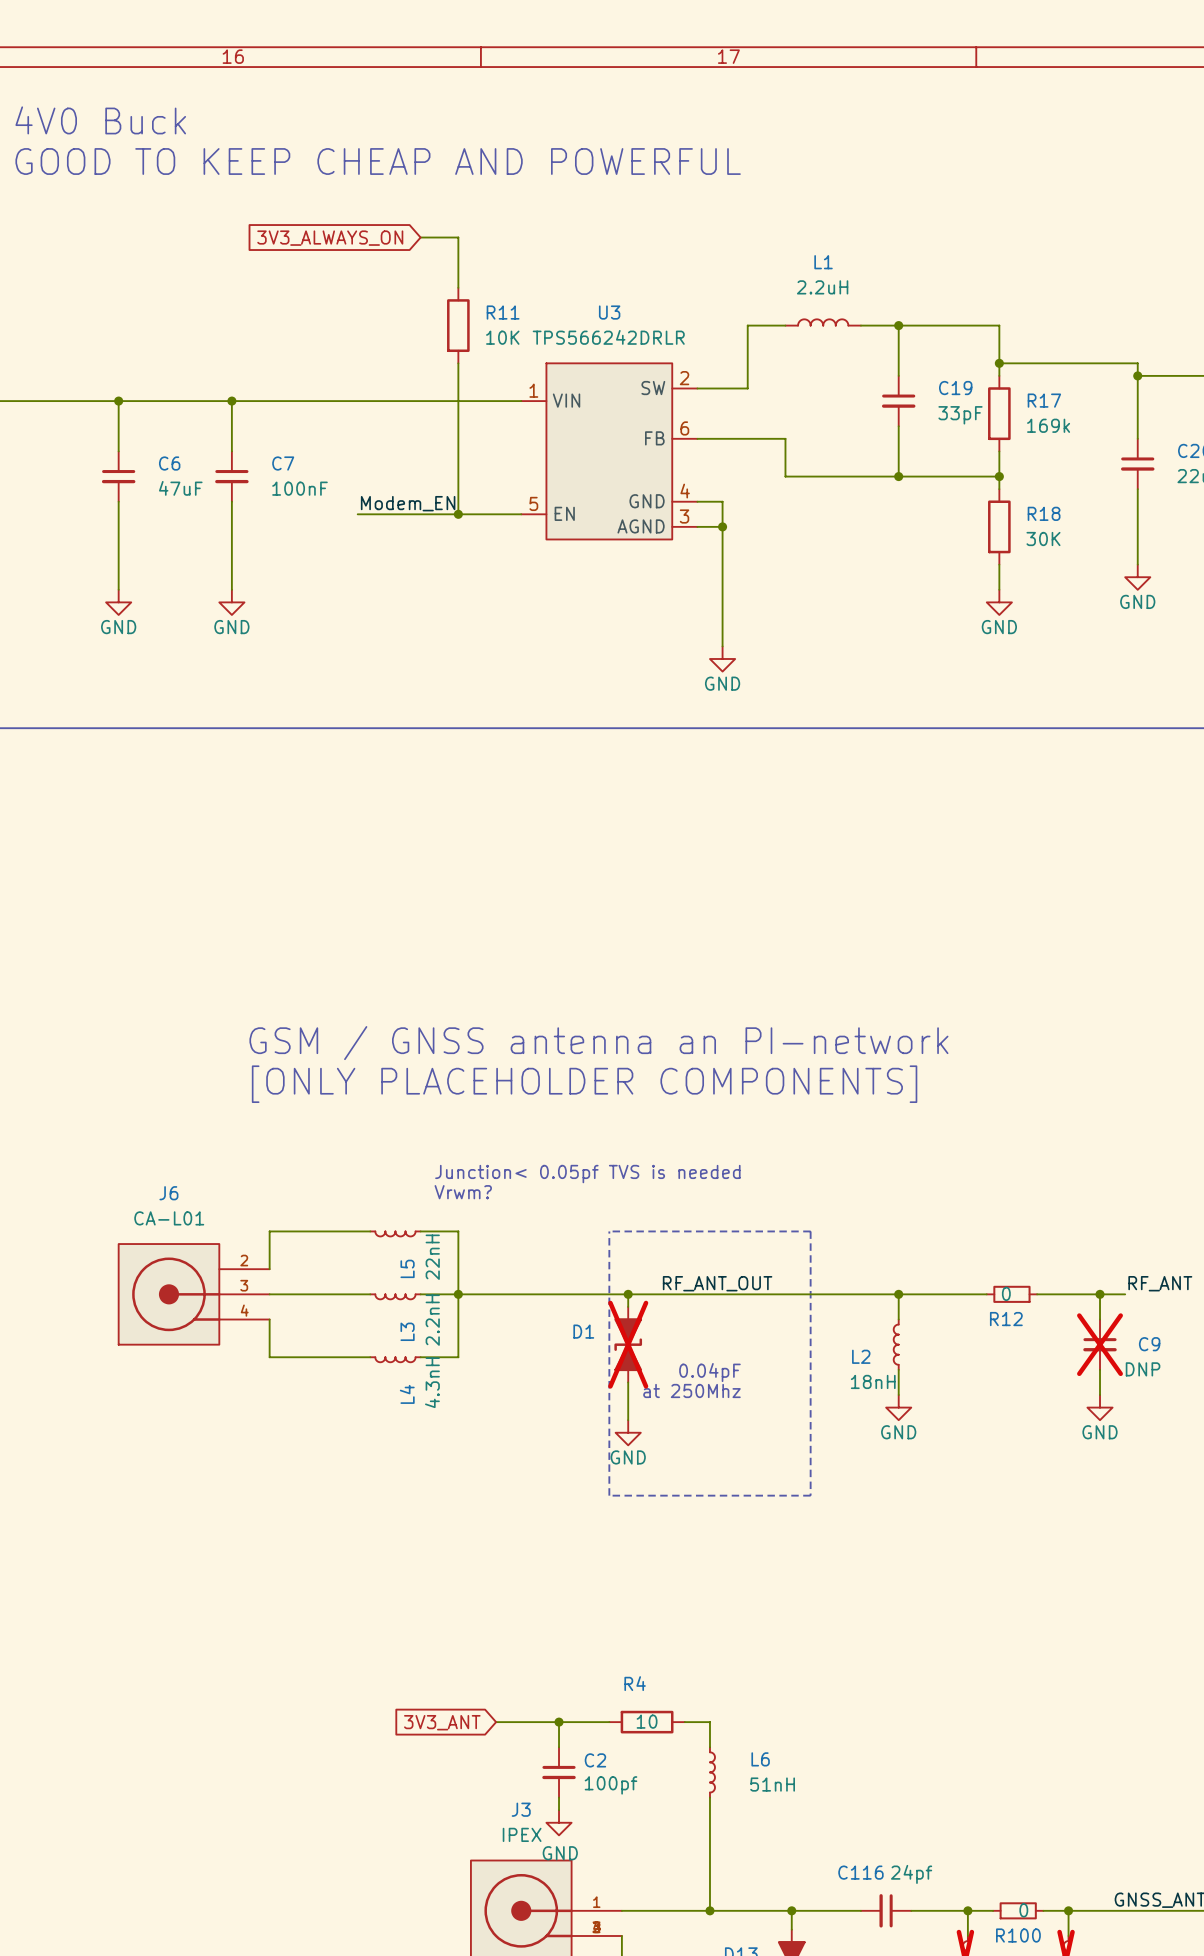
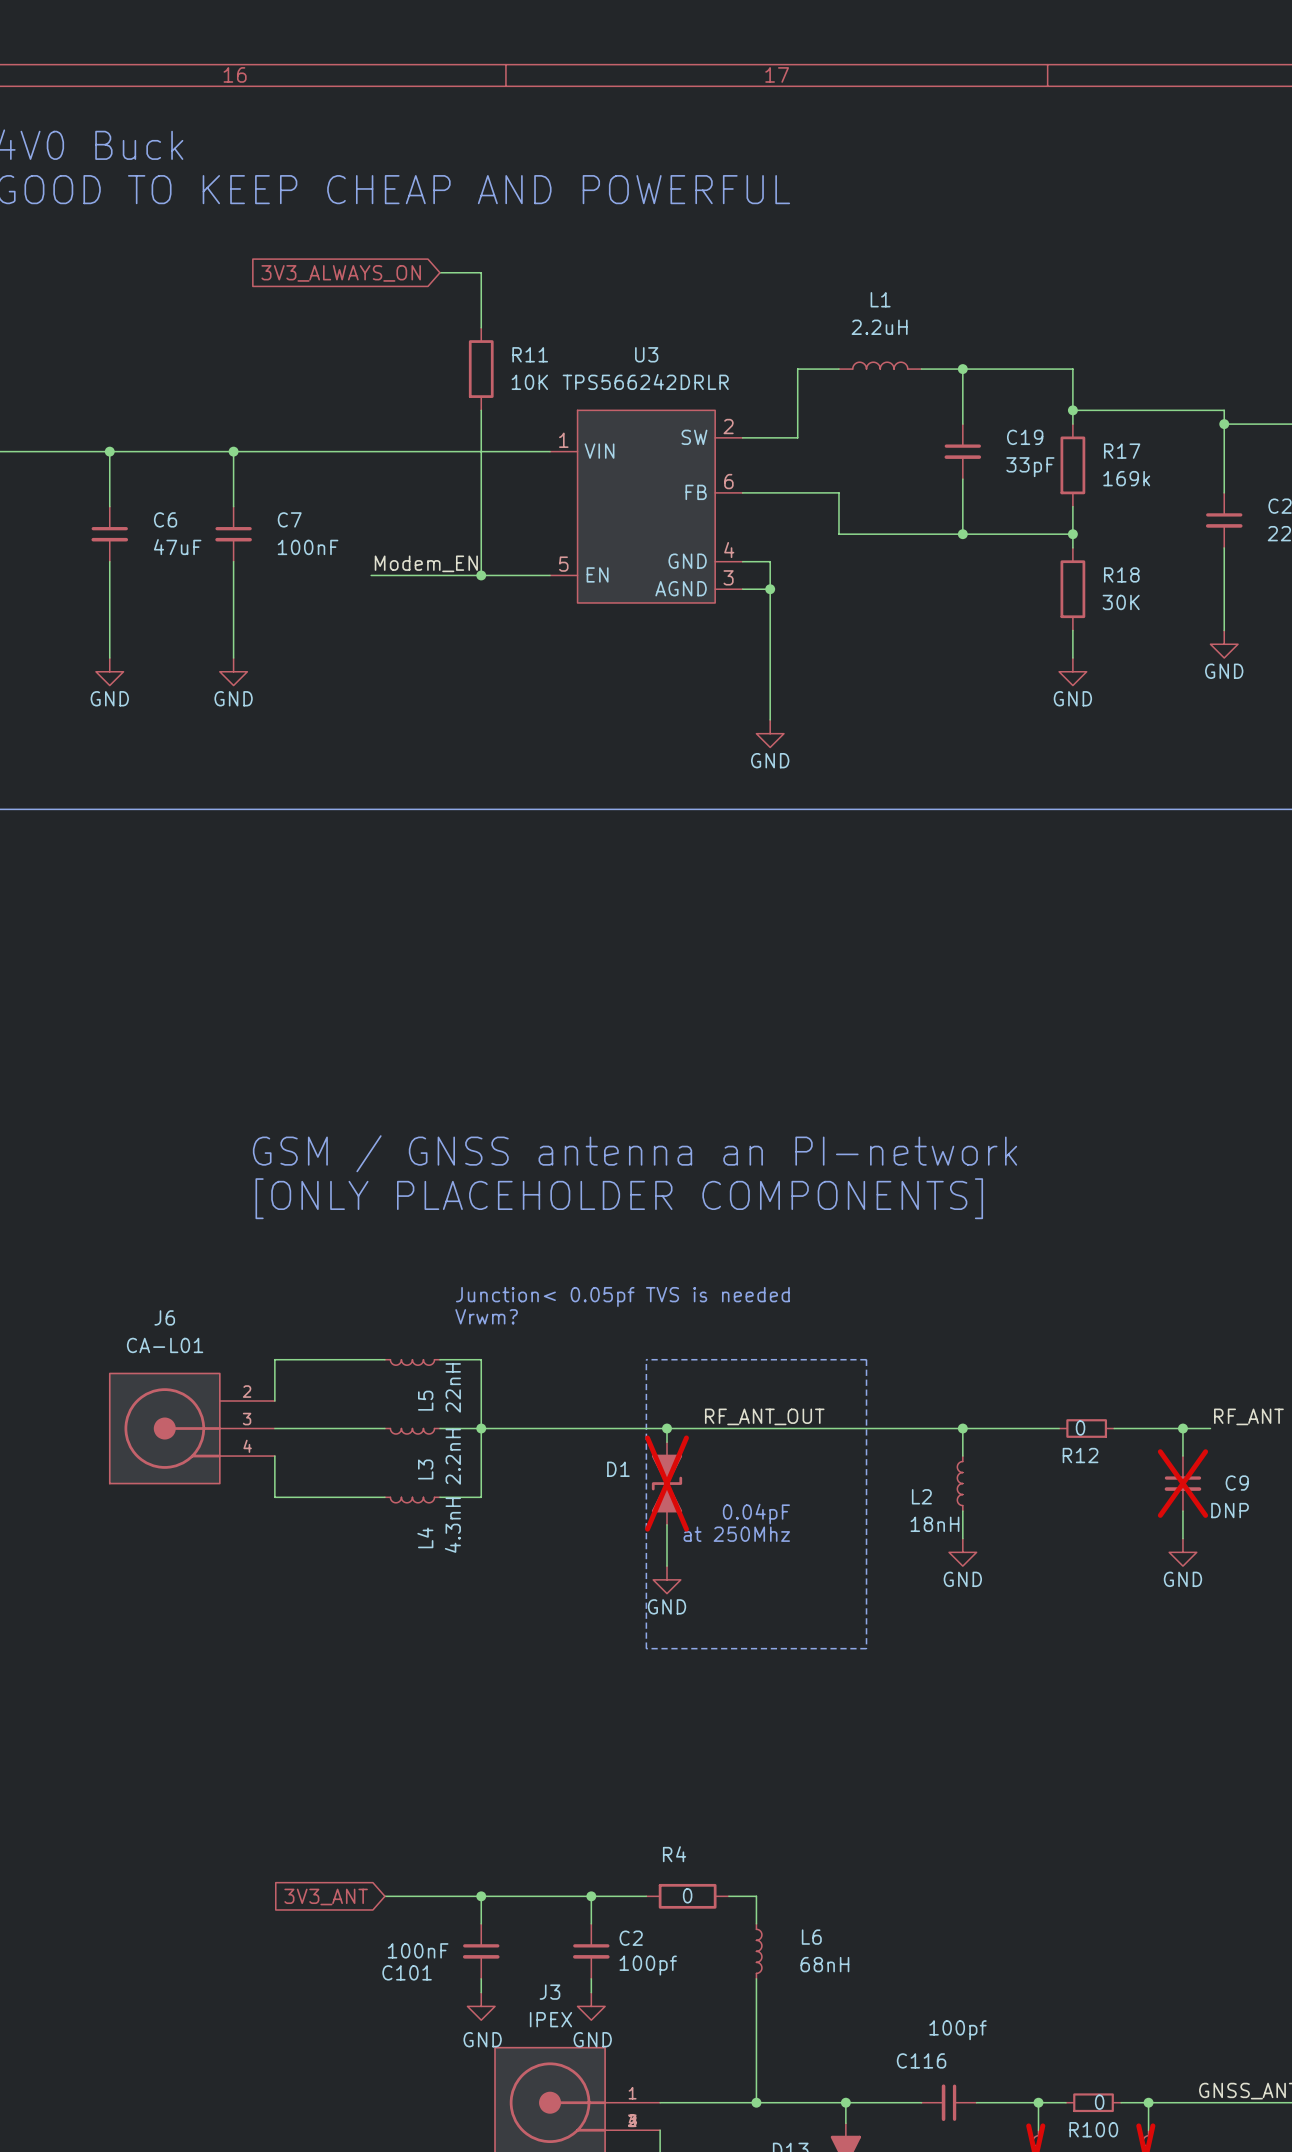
R4 value: 10 (647, 1721) -> 0 (687, 1895)
wire: none -> (384, 1896) (522, 1896)
global label position: 3V3_ANT (442, 1722) -> 3V3_ANT (326, 1896)
wire: none -> (481, 1896) (481, 1923)
junction: none -> (481, 1896)
C101: none -> 100nF (481, 1951)
L6 value: 51nH (772, 1784) -> 68nH (824, 1964)
wire: none -> (481, 1978) (481, 1992)
power symbol: none -> GND (481, 2006)
C116 value: 24pf (911, 1874) -> 100pf (957, 2030)

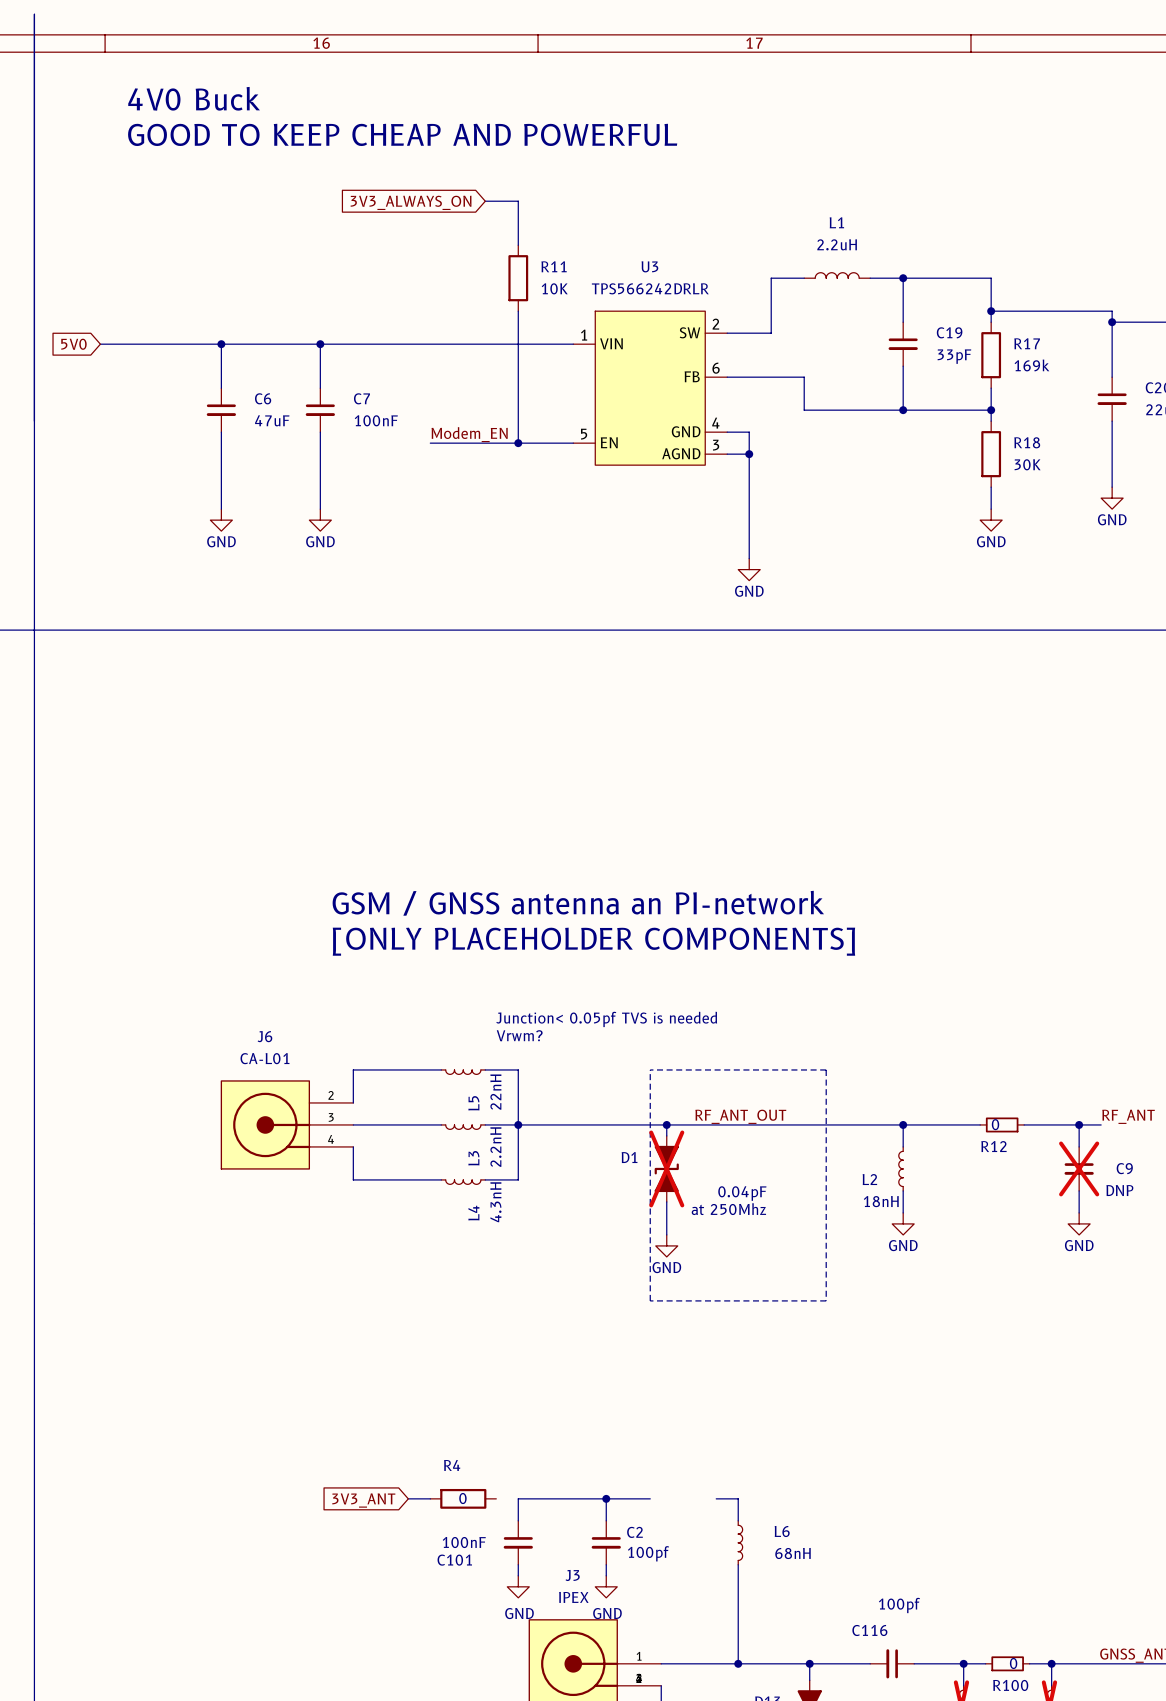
global label position: 3V3_ANT (326, 1896) -> 3V3_ANT (363, 1500)
wire: none -> (408, 1498) (430, 1498)
wire: (384, 1896) (481, 1896) -> none
junction: (481, 1896) -> none
R4 position: (687, 1896) -> (463, 1498)

